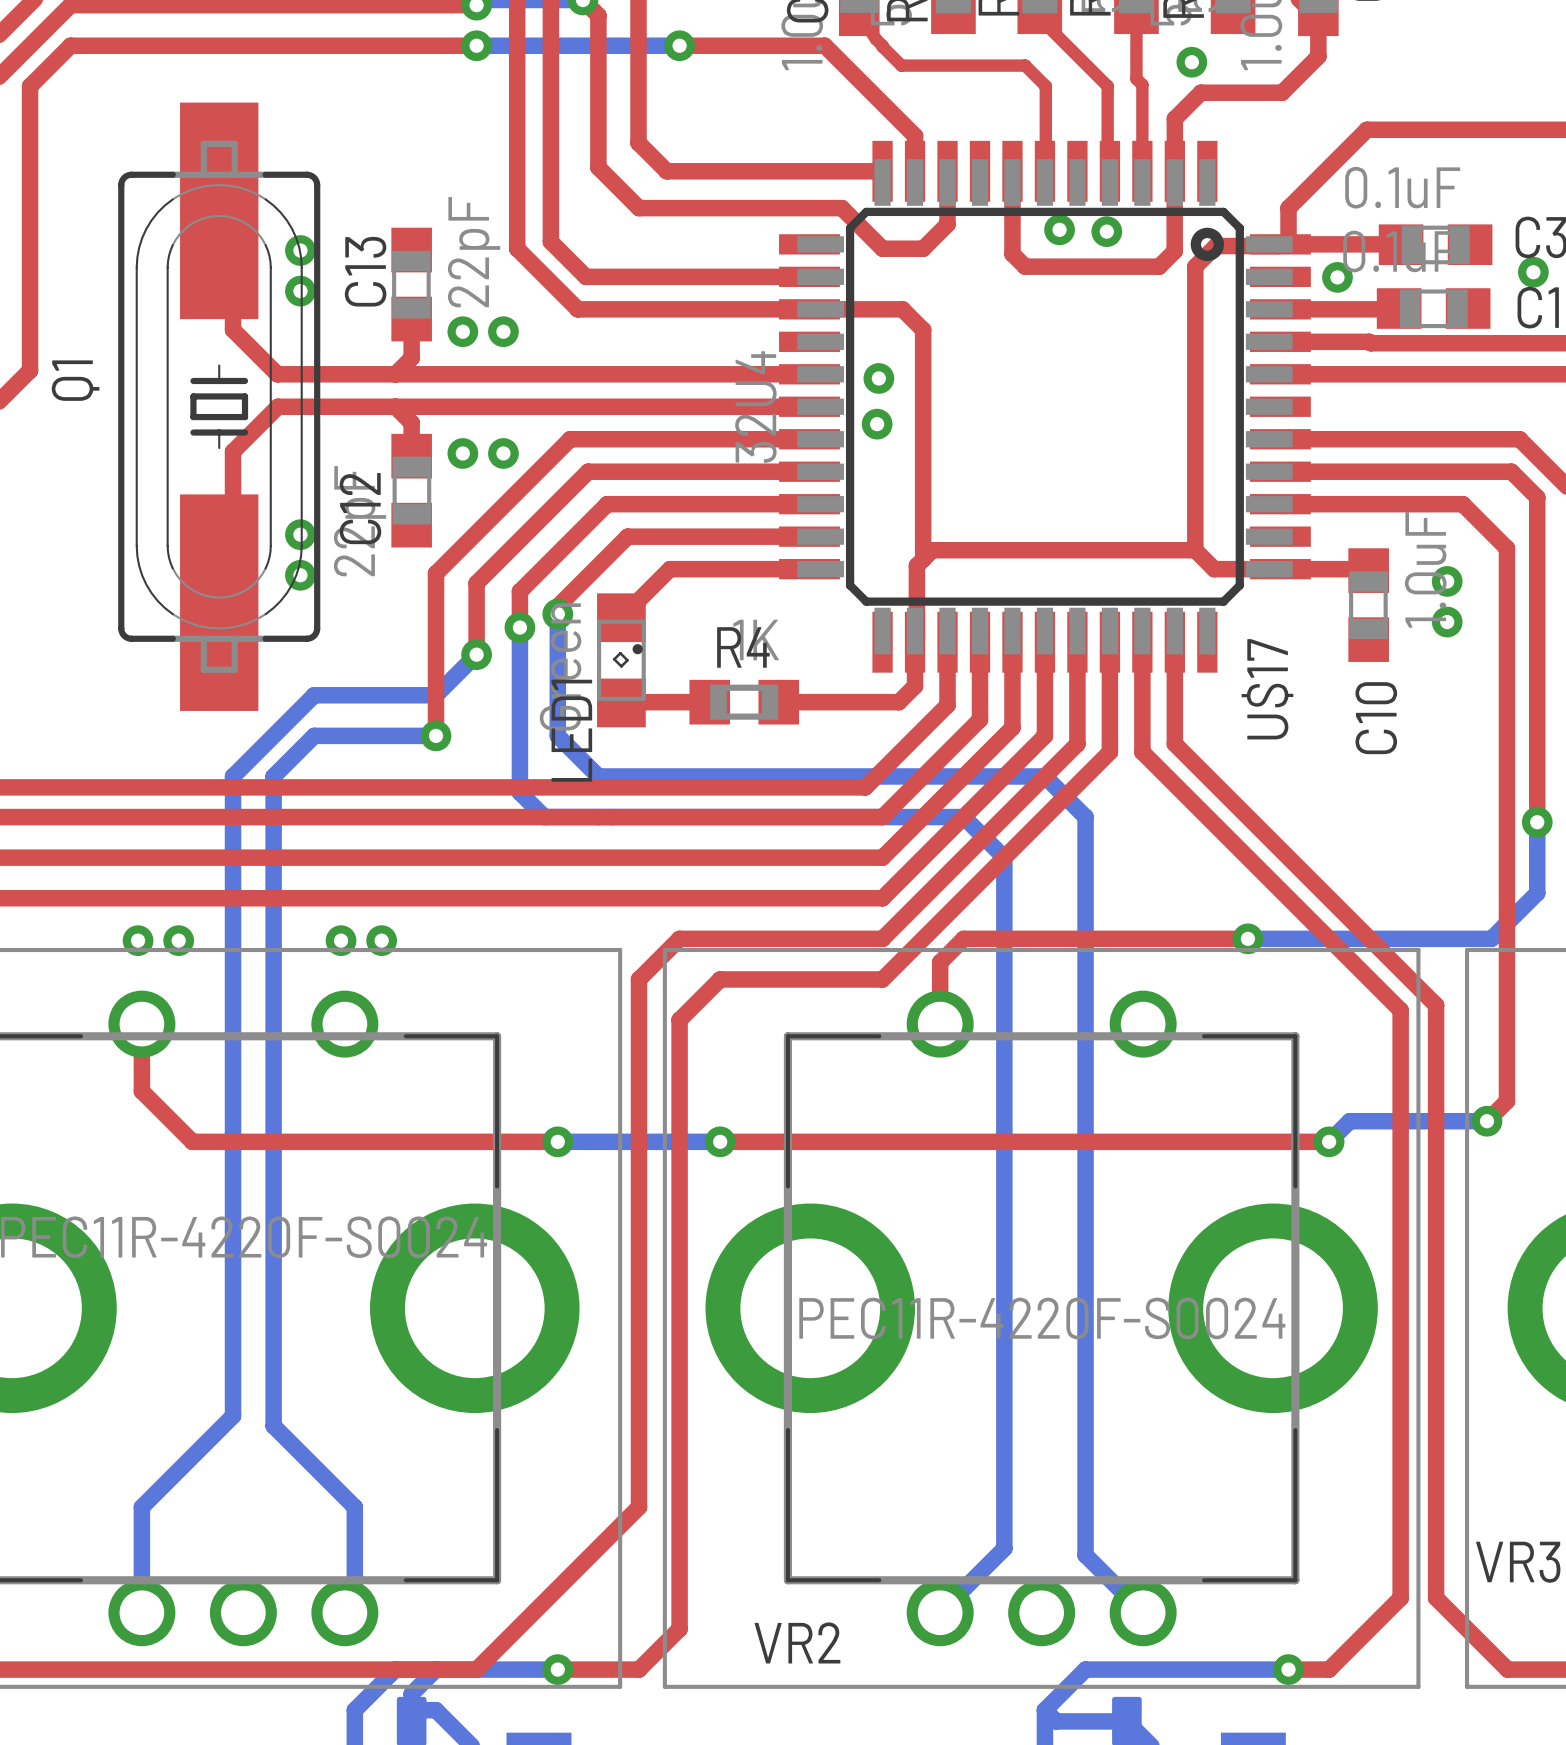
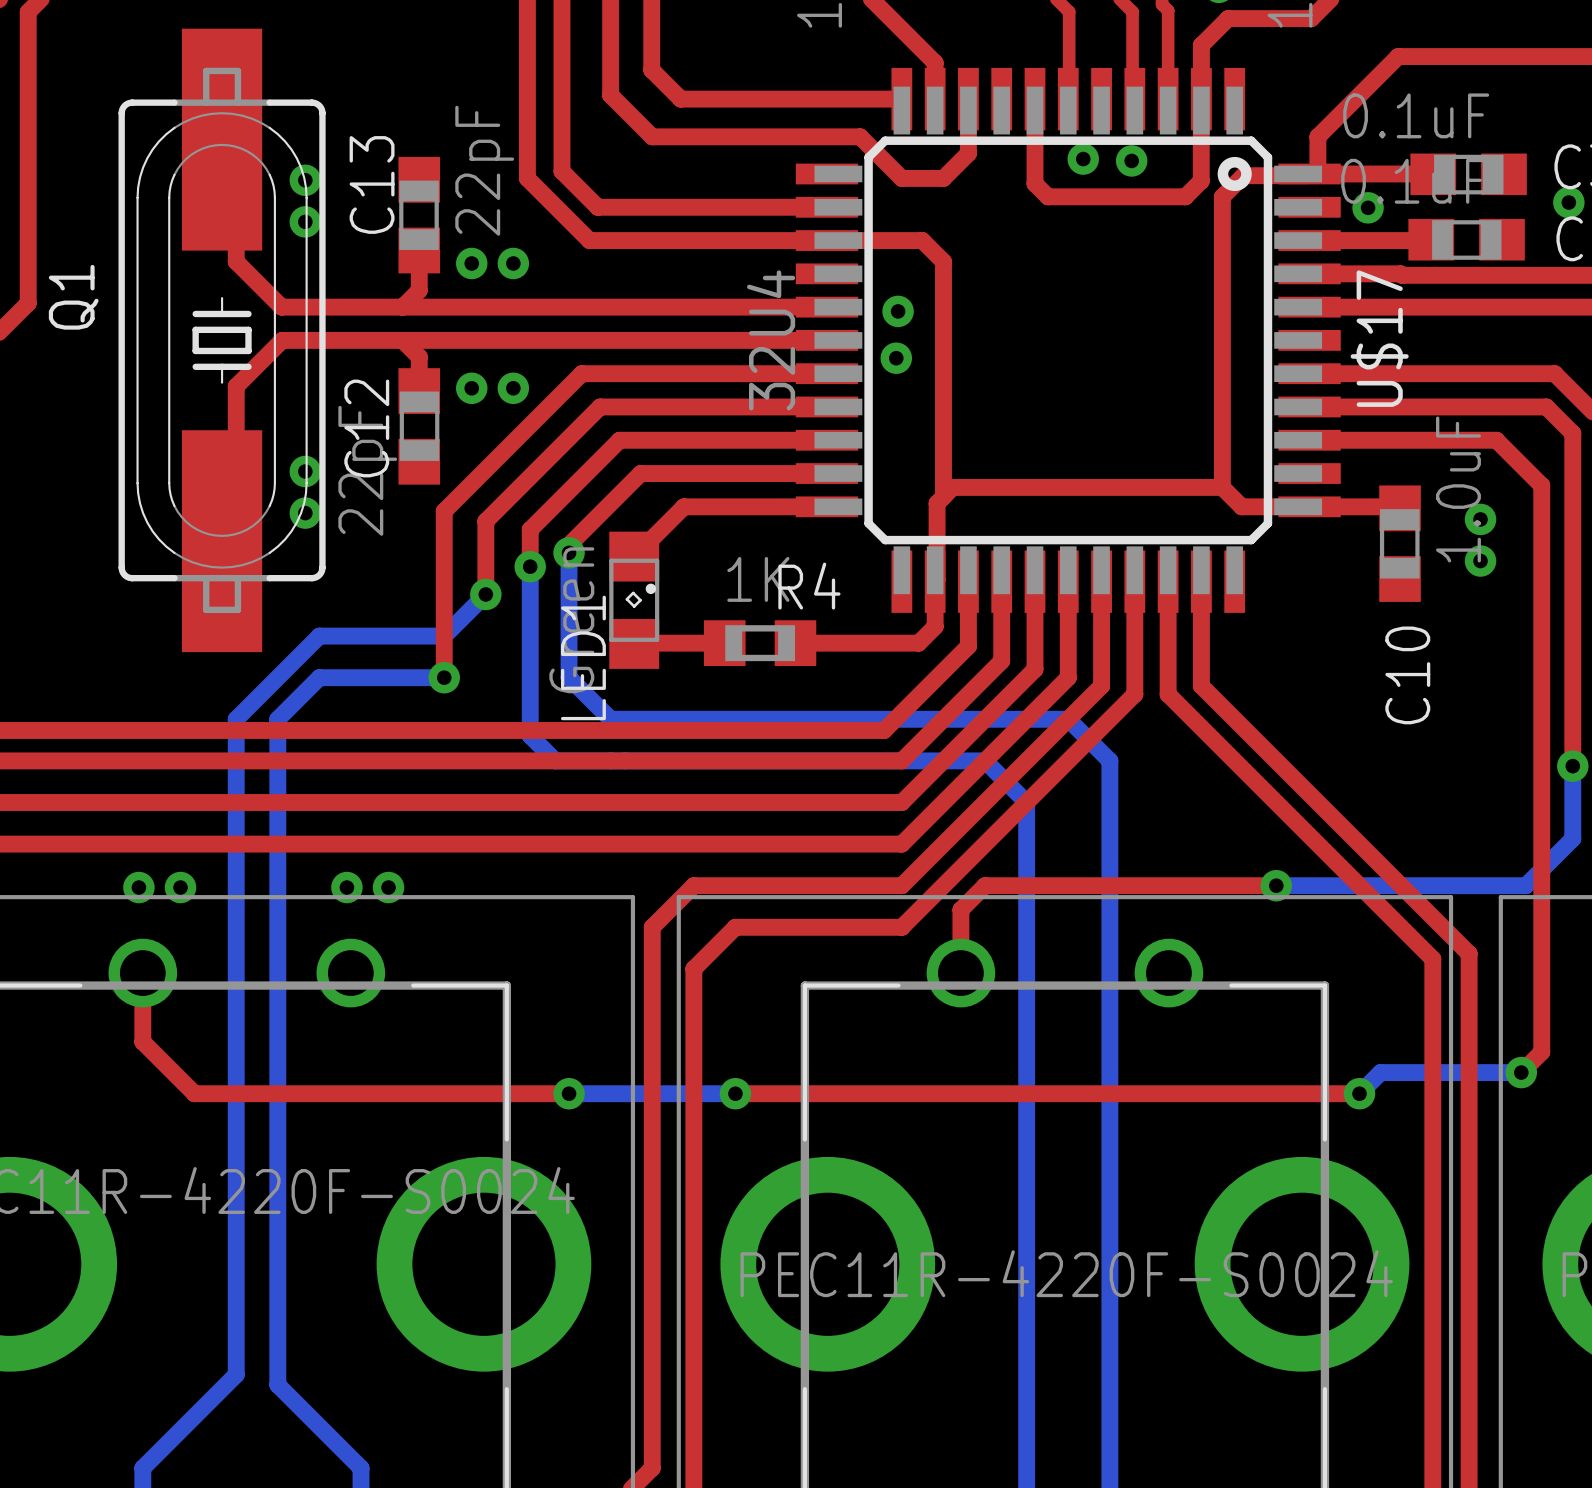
R4 name position: R4 (743, 647) -> R4 (809, 586)
U$17 name position: U$17 (1267, 689) -> U$17 (1379, 338)

